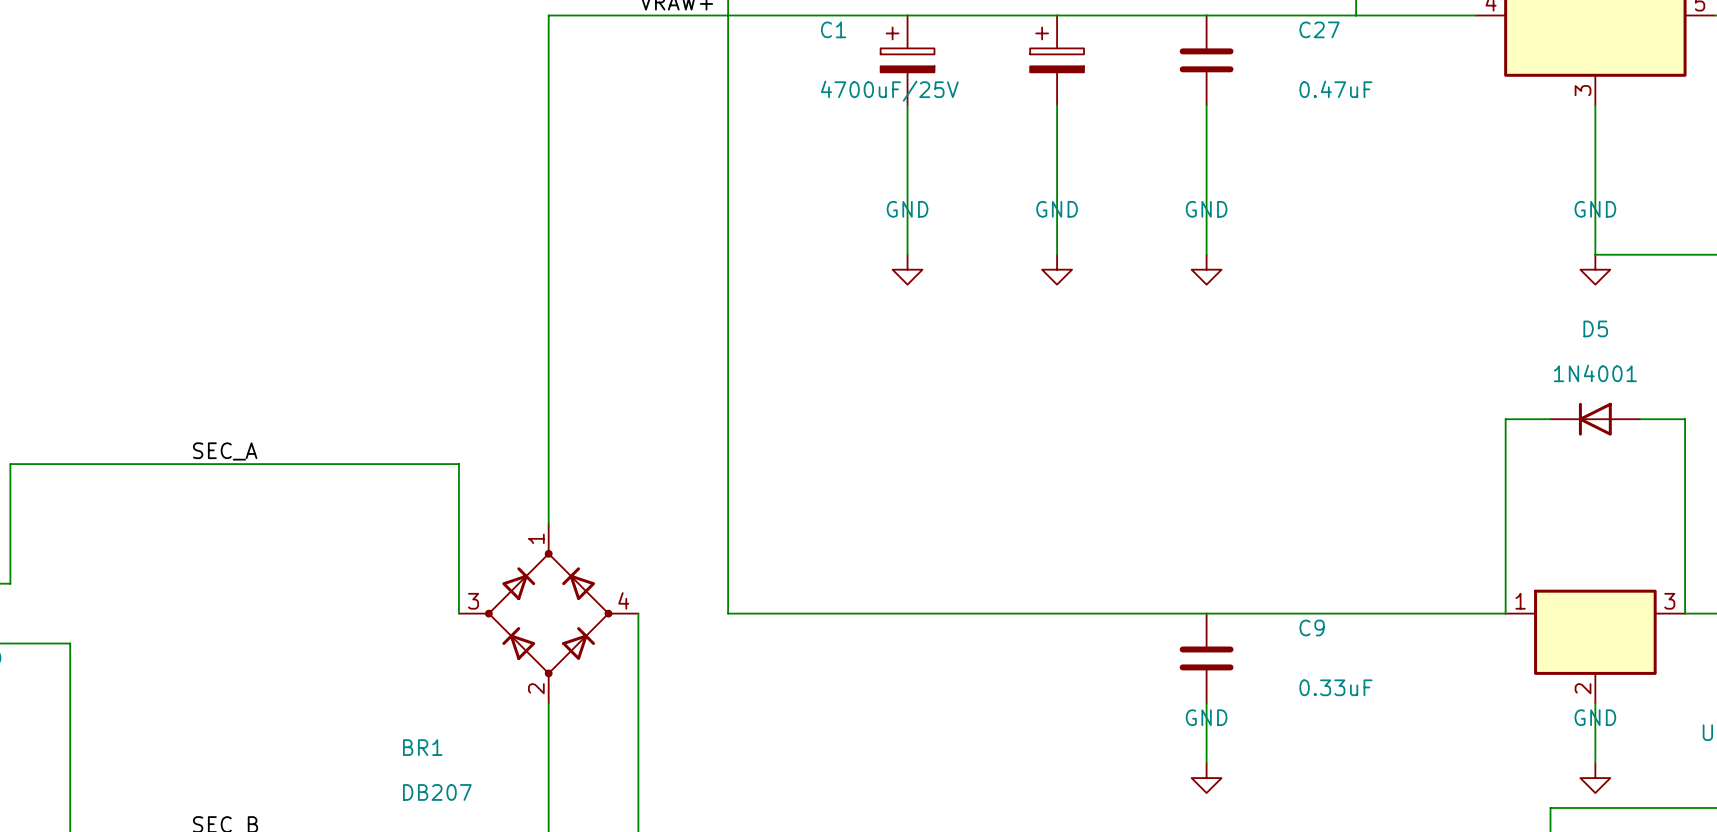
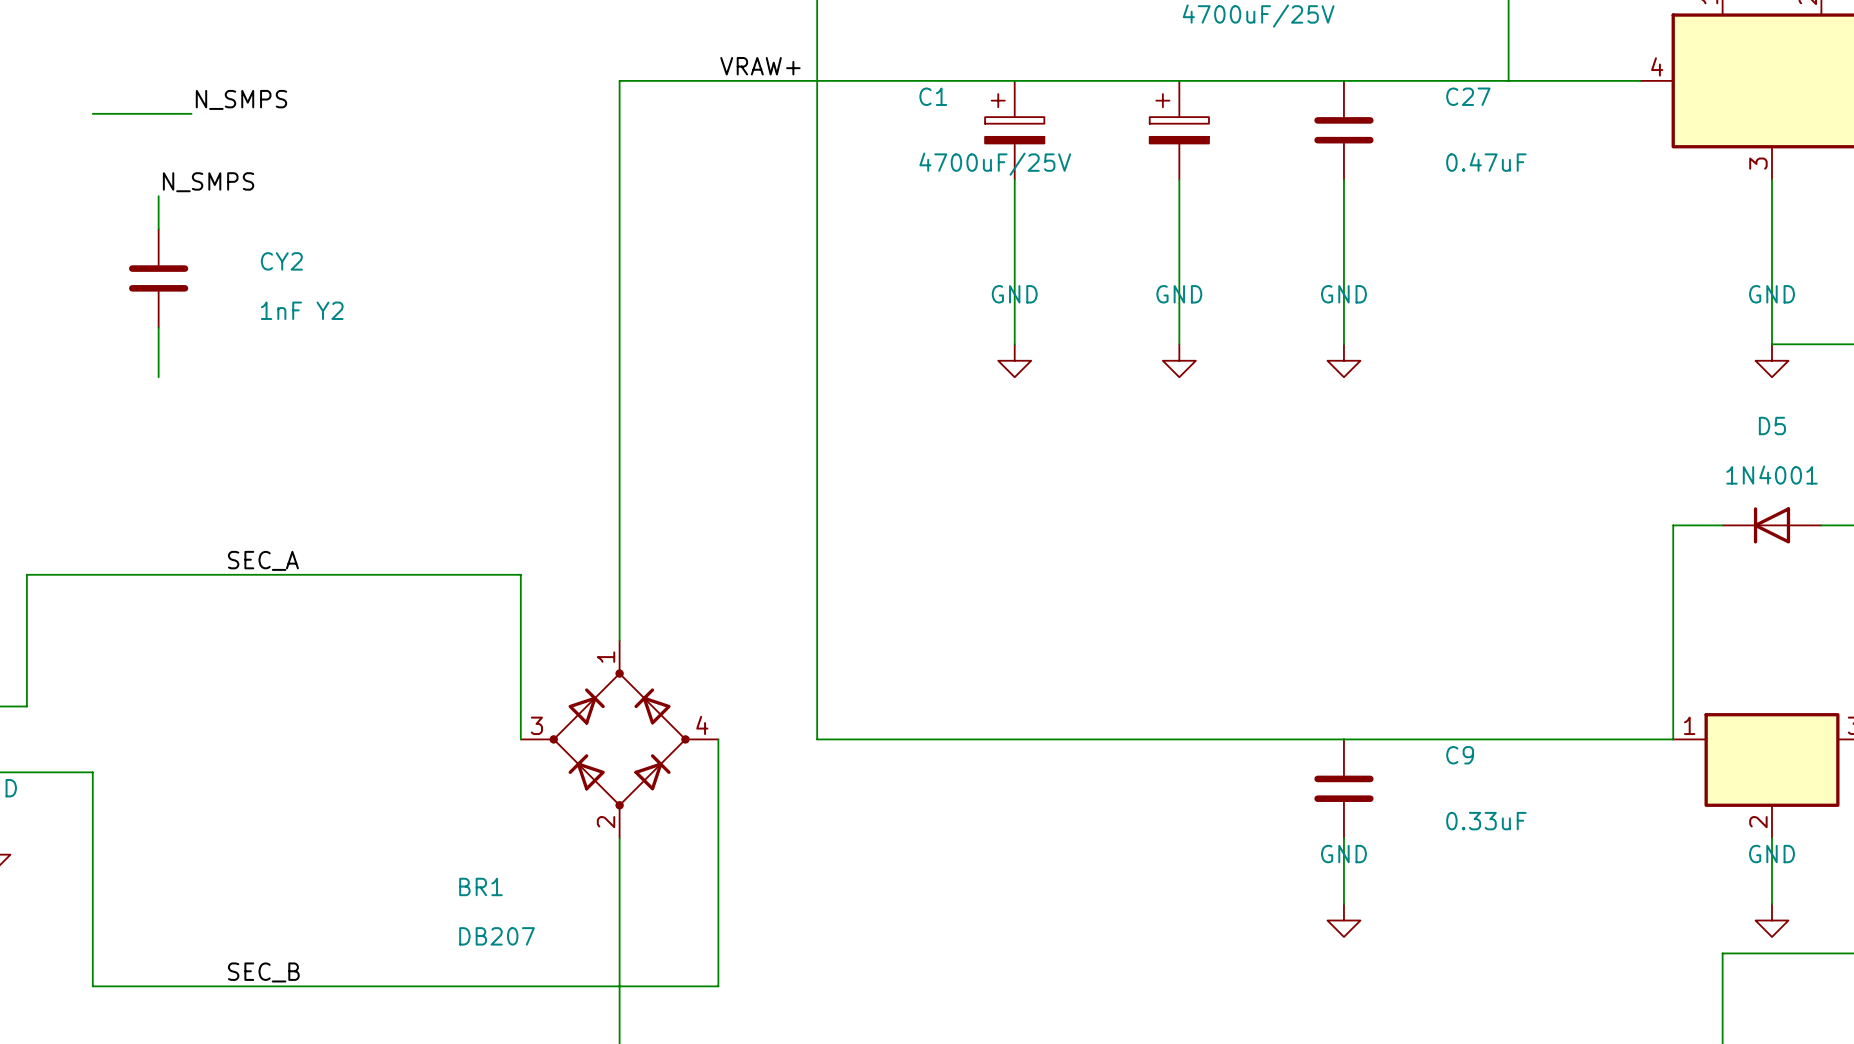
label: none -> N_SMPS (241, 99)
wire: none -> (92, 113) (191, 113)
label: none -> N_SMPS (208, 182)
wire: none -> (158, 196) (158, 229)
CY2: none -> 1nF Y2 (158, 278)
wire: none -> (158, 327) (158, 377)

